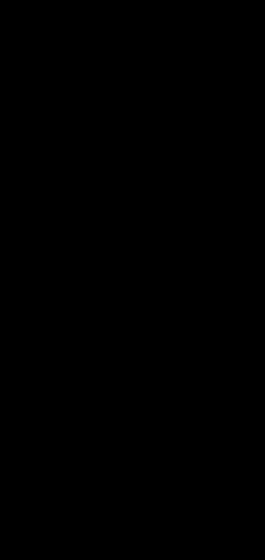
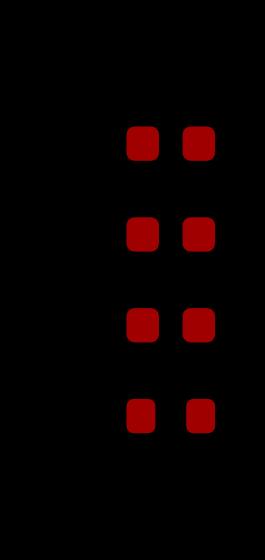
part: none -> (170, 143)
part: none -> (170, 234)
part: none -> (170, 325)
part: none -> (170, 416)

